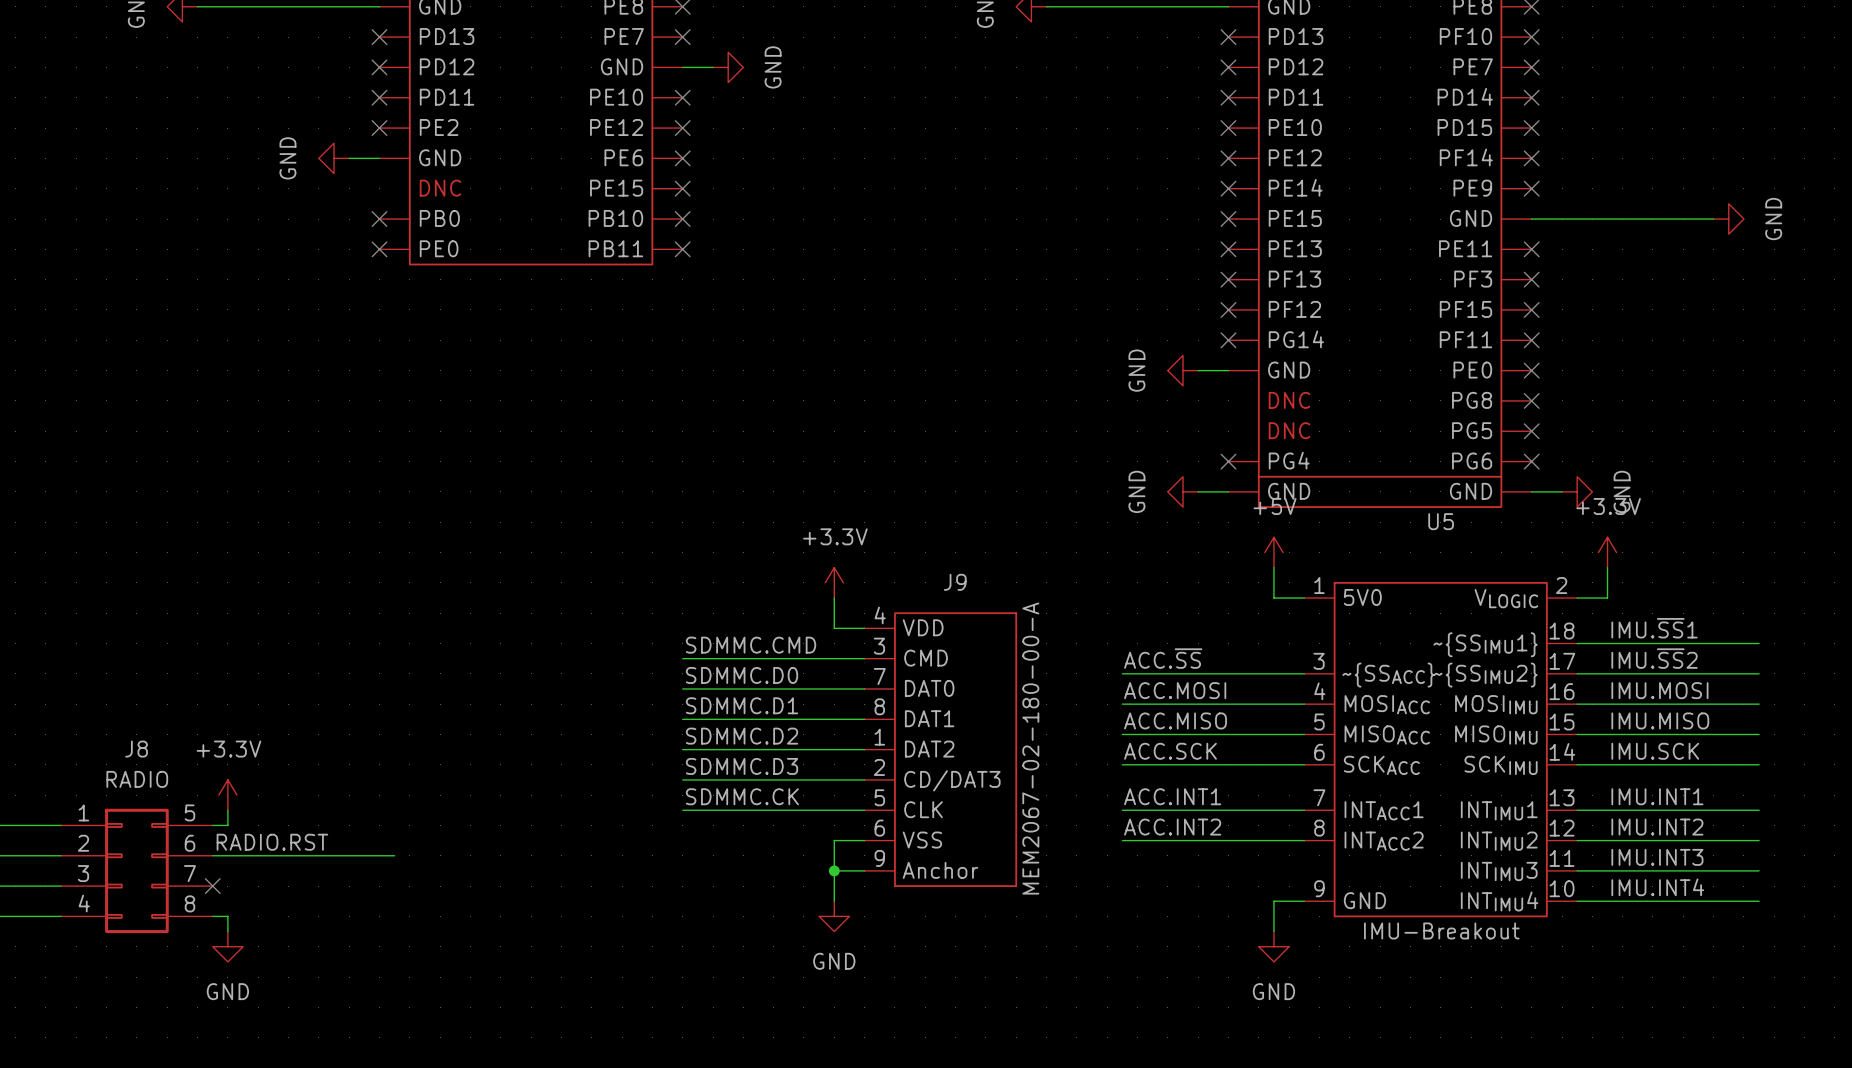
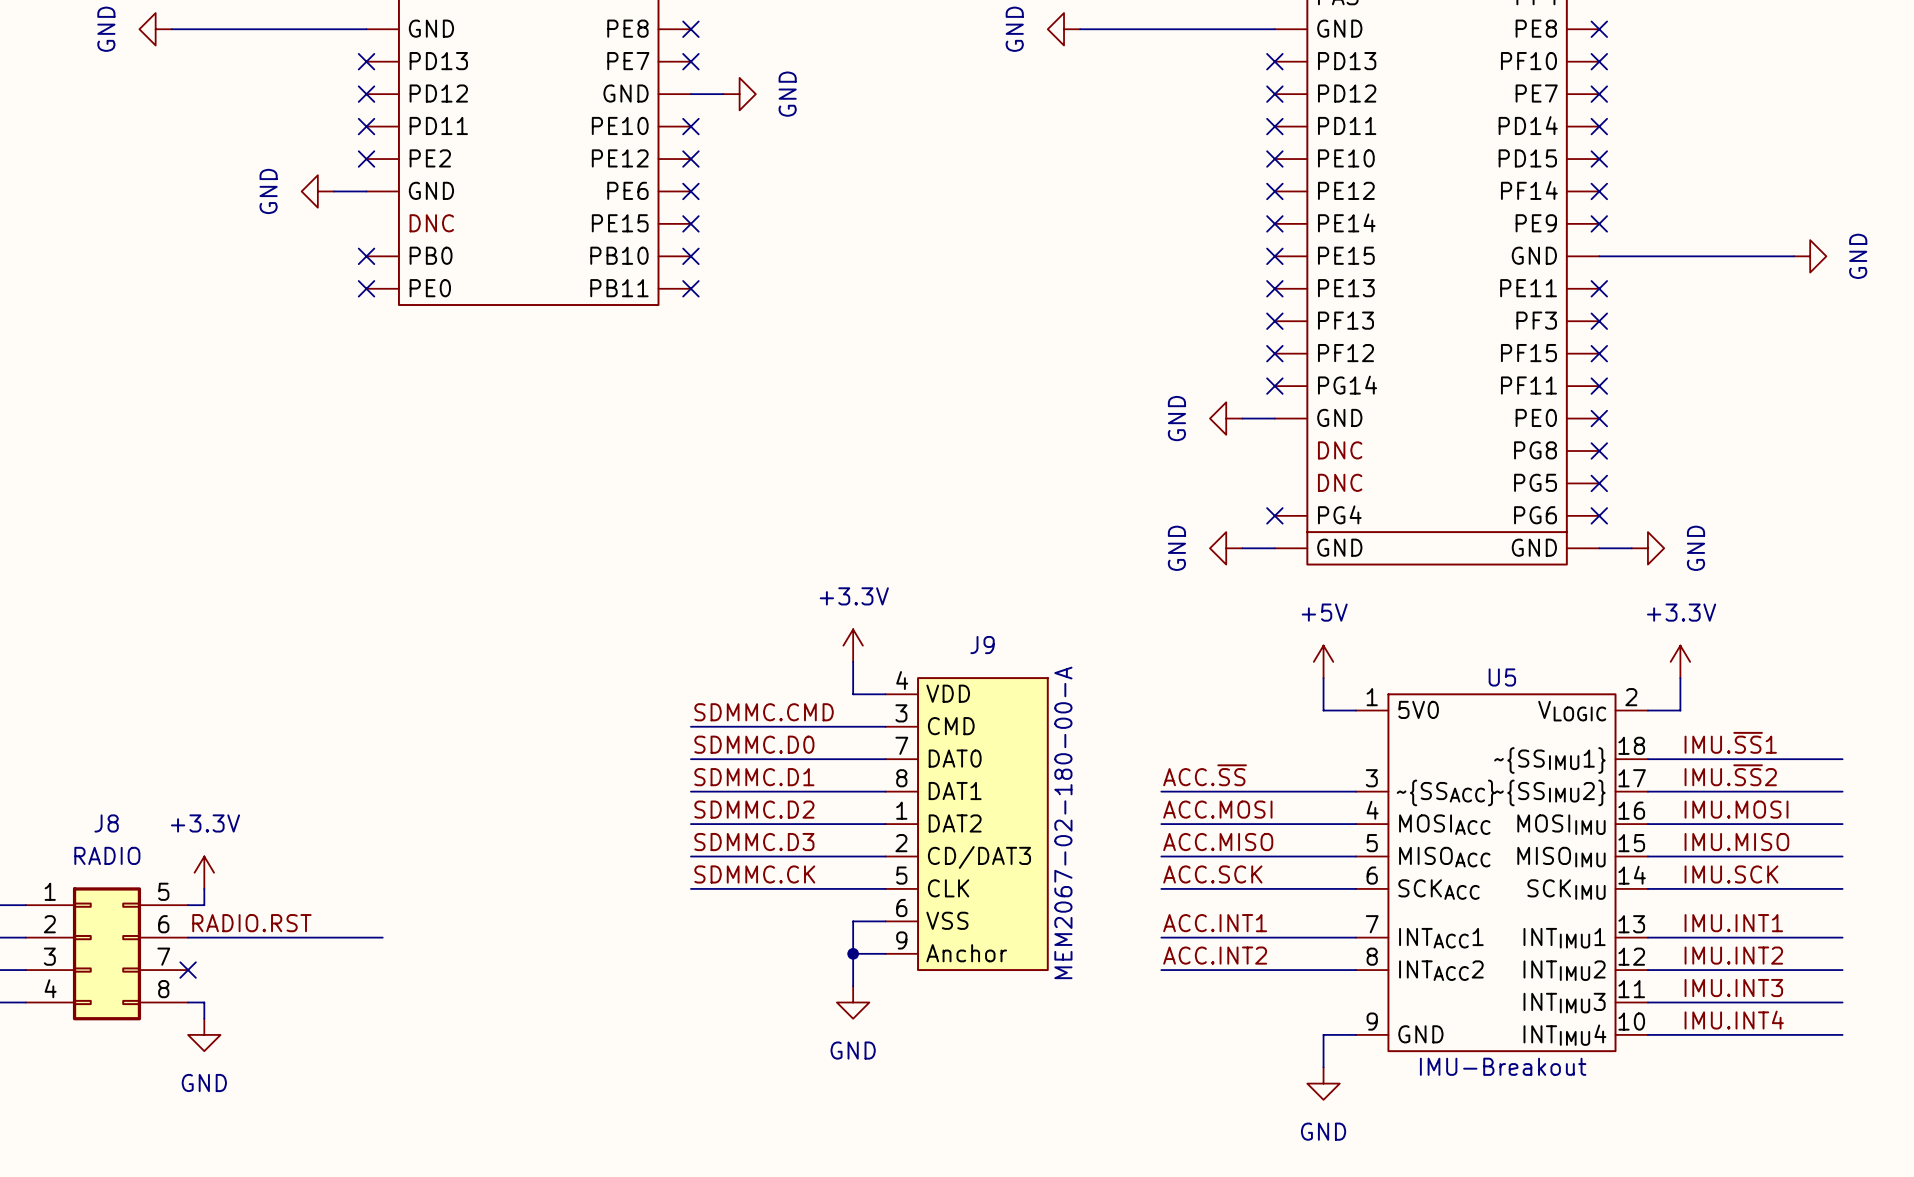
U5 name position: U5 (1441, 521) -> U5 (1502, 677)
power symbol position: +5V (1273, 552) -> +5V (1323, 661)
power symbol position: +3.3V (1607, 552) -> +3.3V (1680, 661)
wire: (1273, 567) (1273, 598) (1304, 598) -> (1323, 678) (1323, 710) (1355, 710)
wire: (1607, 567) (1607, 598) (1577, 598) -> none
label position: IMU.~{SS}1 (1654, 628) -> IMU.~{SS}1 (1730, 742)
wire: (1607, 643) (1759, 643) -> (1680, 710) (1680, 678)
label position: ACC.~{SS} (1163, 658) -> ACC.~{SS} (1205, 775)
label position: IMU.~{SS}2 (1654, 658) -> IMU.~{SS}2 (1730, 775)
wire: (1122, 673) (1304, 673) -> (1161, 791) (1355, 791)
wire: (1577, 673) (1759, 673) -> (1647, 791) (1842, 791)
wire: none -> (1647, 759) (1842, 759)
label position: ACC.MOSI (1175, 690) -> ACC.MOSI (1217, 809)
label position: IMU.MOSI (1659, 690) -> IMU.MOSI (1736, 809)
wire: (1122, 704) (1304, 704) -> (1161, 824) (1355, 824)
wire: (1577, 704) (1759, 704) -> (1647, 824) (1842, 824)
label position: ACC.MISO (1175, 720) -> ACC.MISO (1218, 842)
label position: IMU.MISO (1660, 720) -> IMU.MISO (1736, 842)
wire: (1122, 734) (1304, 734) -> (1161, 856) (1355, 856)
wire: (1577, 734) (1759, 734) -> (1647, 856) (1842, 856)
U5 position: (1440, 749) -> (1501, 872)
label: ACC.SCK (1170, 751) -> none
label: IMU.SCK (1655, 751) -> none
wire: (1122, 764) (1304, 764) -> (1161, 937) (1355, 937)
wire: (1577, 764) (1759, 764) -> (1647, 937) (1842, 937)
label: ACC.INT1 (1172, 796) -> ACC.SCK (1212, 874)
label: IMU.INT1 (1657, 796) -> IMU.SCK (1731, 874)
label position: ACC.INT2 (1172, 827) -> ACC.INT2 (1215, 955)
label position: IMU.INT2 (1657, 827) -> IMU.INT2 (1733, 955)
wire: (1122, 840) (1304, 840) -> (1161, 970) (1355, 970)
wire: (1577, 840) (1759, 840) -> (1647, 970) (1842, 970)
label: none -> ACC.INT1 (1215, 923)
label: none -> IMU.INT1 (1733, 923)
label position: IMU.INT3 (1657, 857) -> IMU.INT3 (1733, 988)
wire: (1577, 870) (1759, 870) -> (1647, 1002) (1842, 1002)
label position: IMU.INT4 (1657, 887) -> IMU.INT4 (1734, 1020)
wire: (1304, 901) (1273, 901) (1273, 931) -> (1355, 1034) (1323, 1034) (1323, 1067)
wire: (1577, 901) (1759, 901) -> (1647, 1034) (1842, 1034)
power symbol position: GND (1273, 946) -> GND (1323, 1083)

